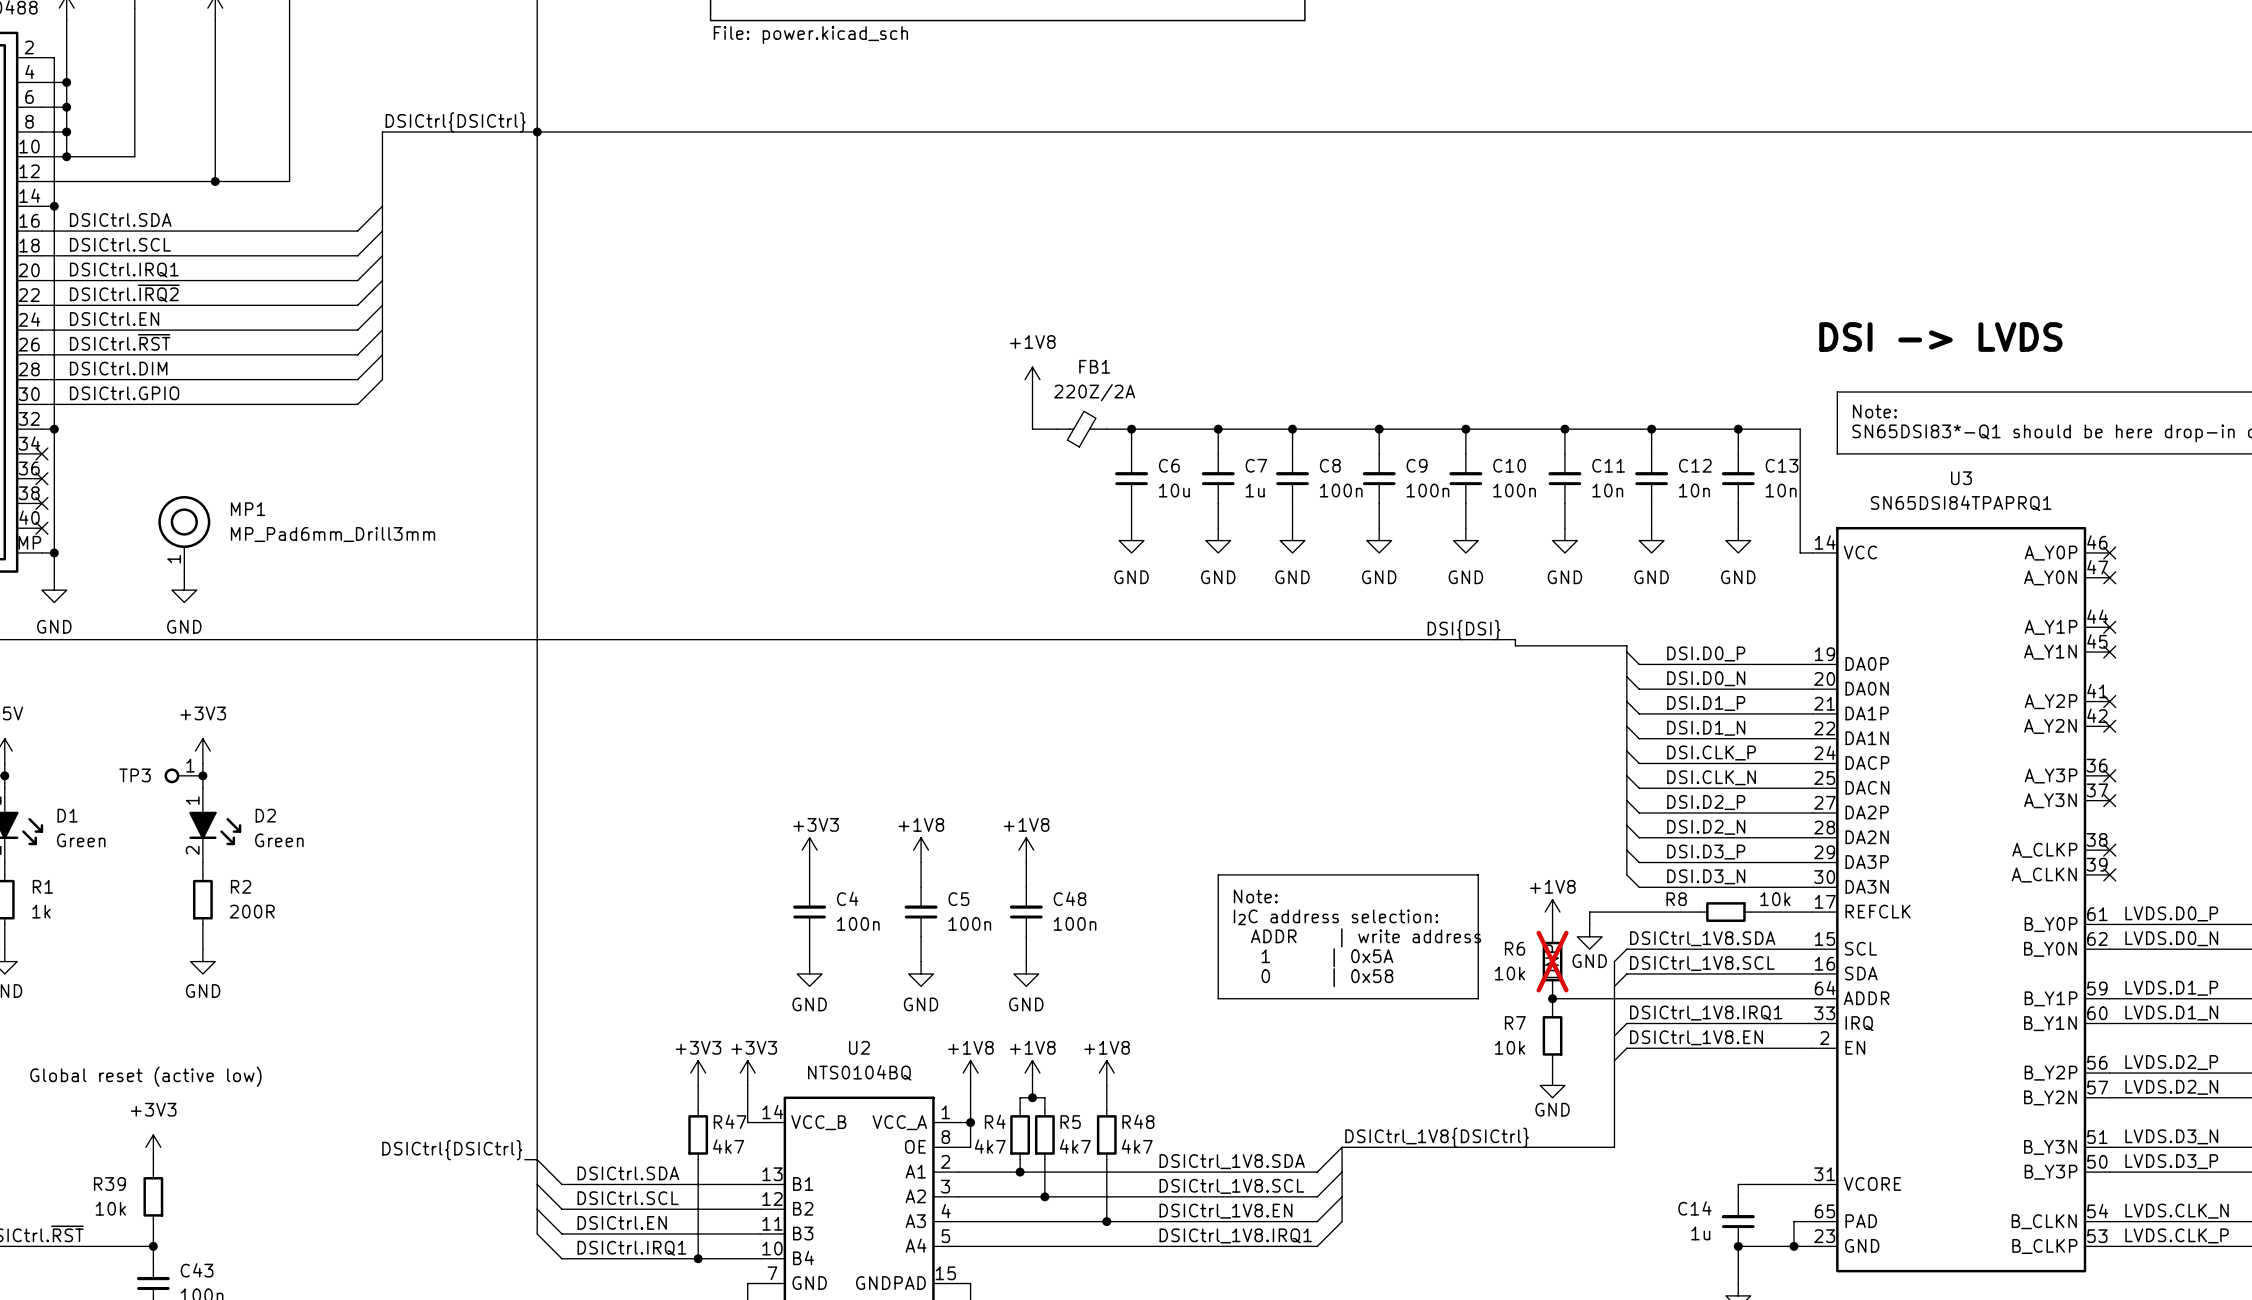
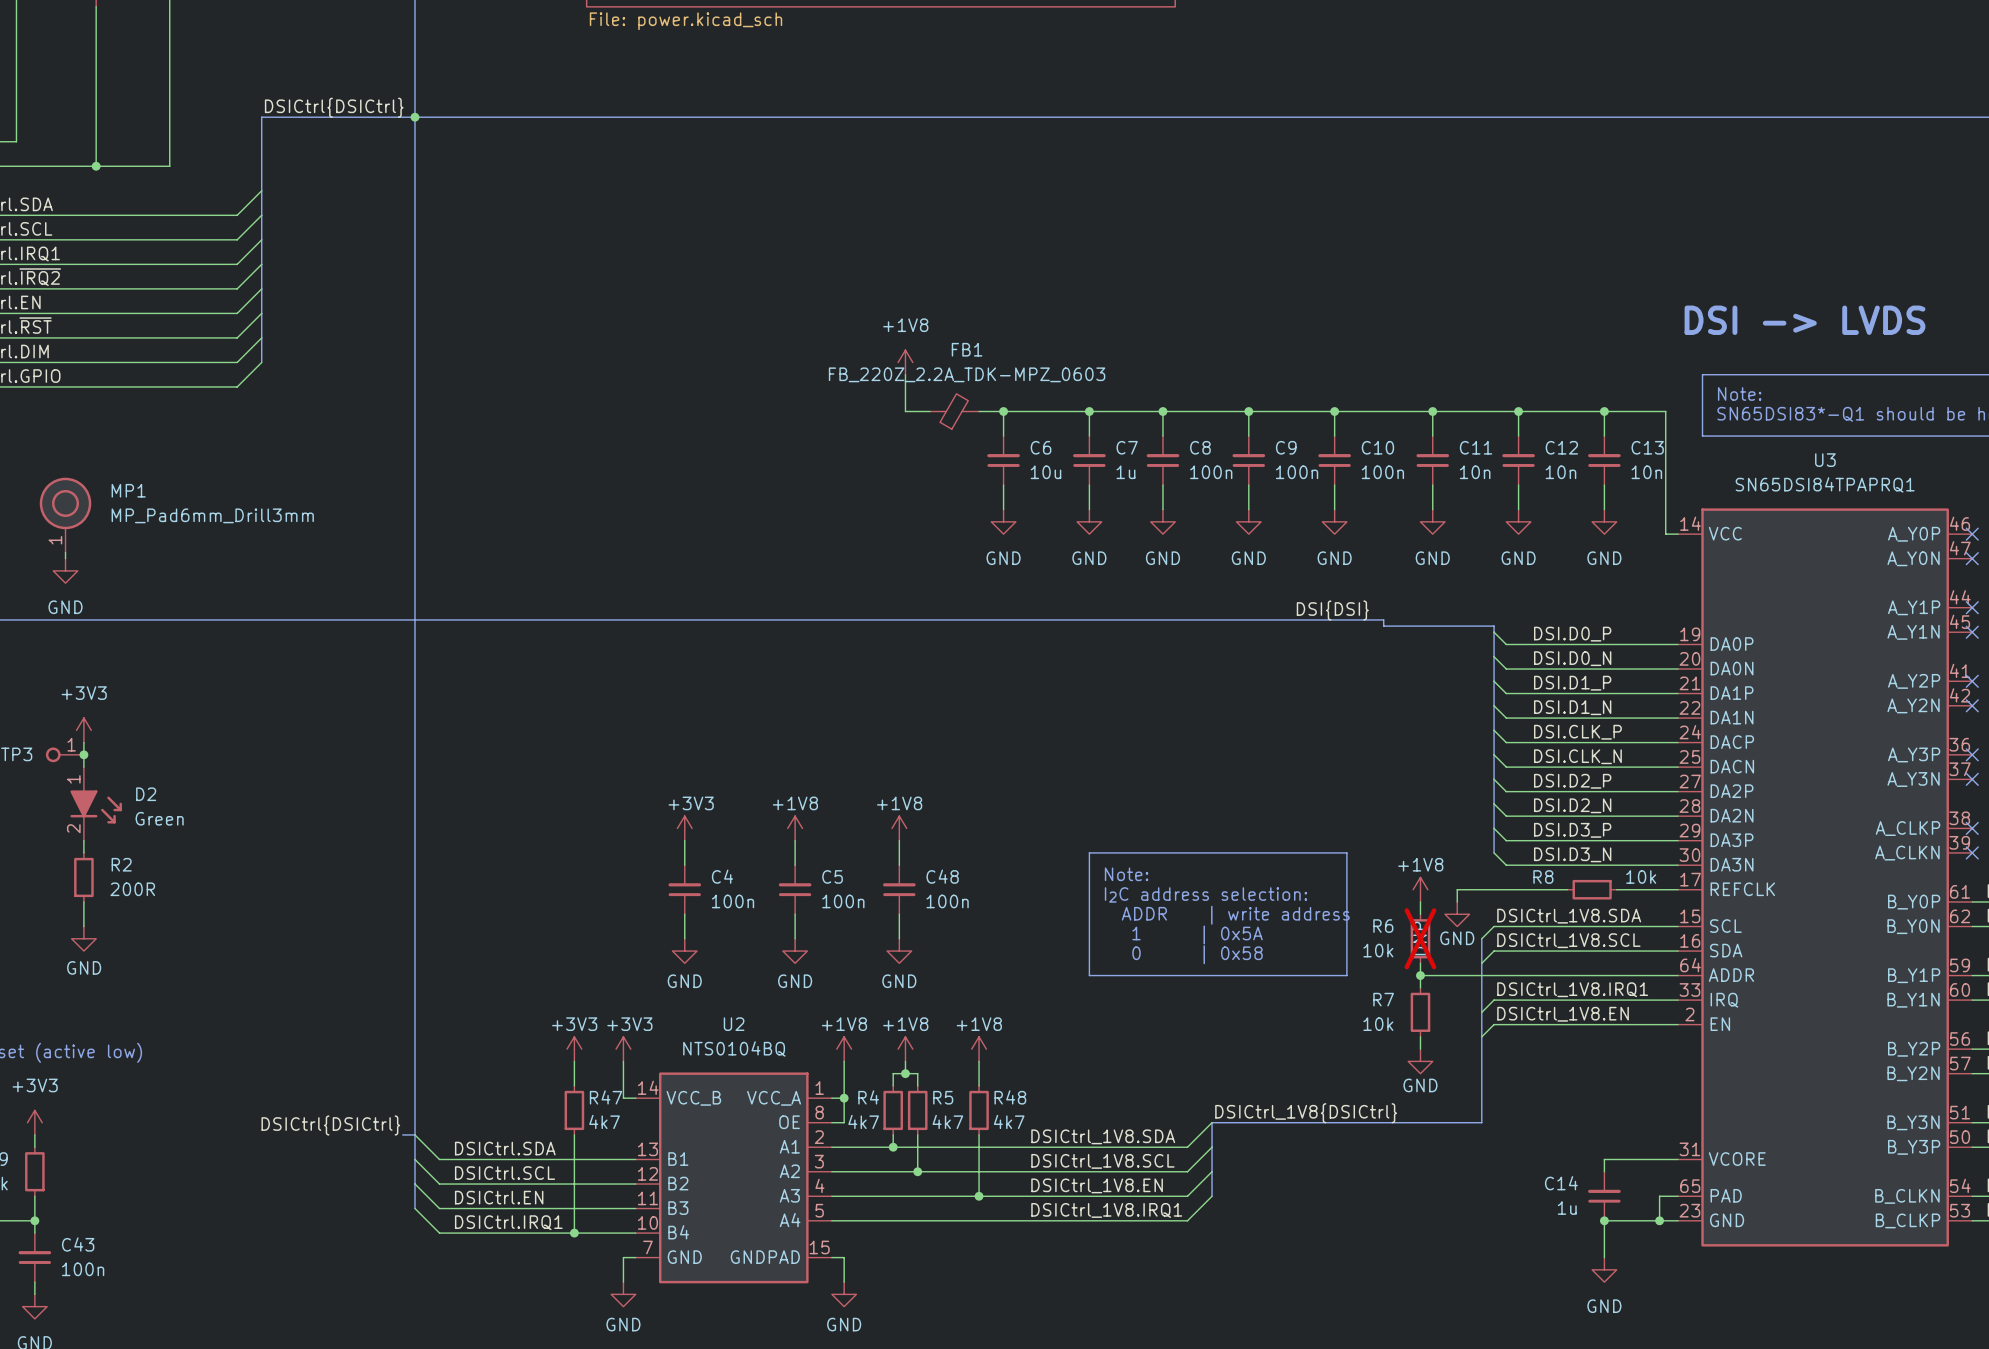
FB1 value: 220Z/2A (1094, 392) -> FB_220Z_2.2A_TDK-MPZ_0603 (967, 374)

